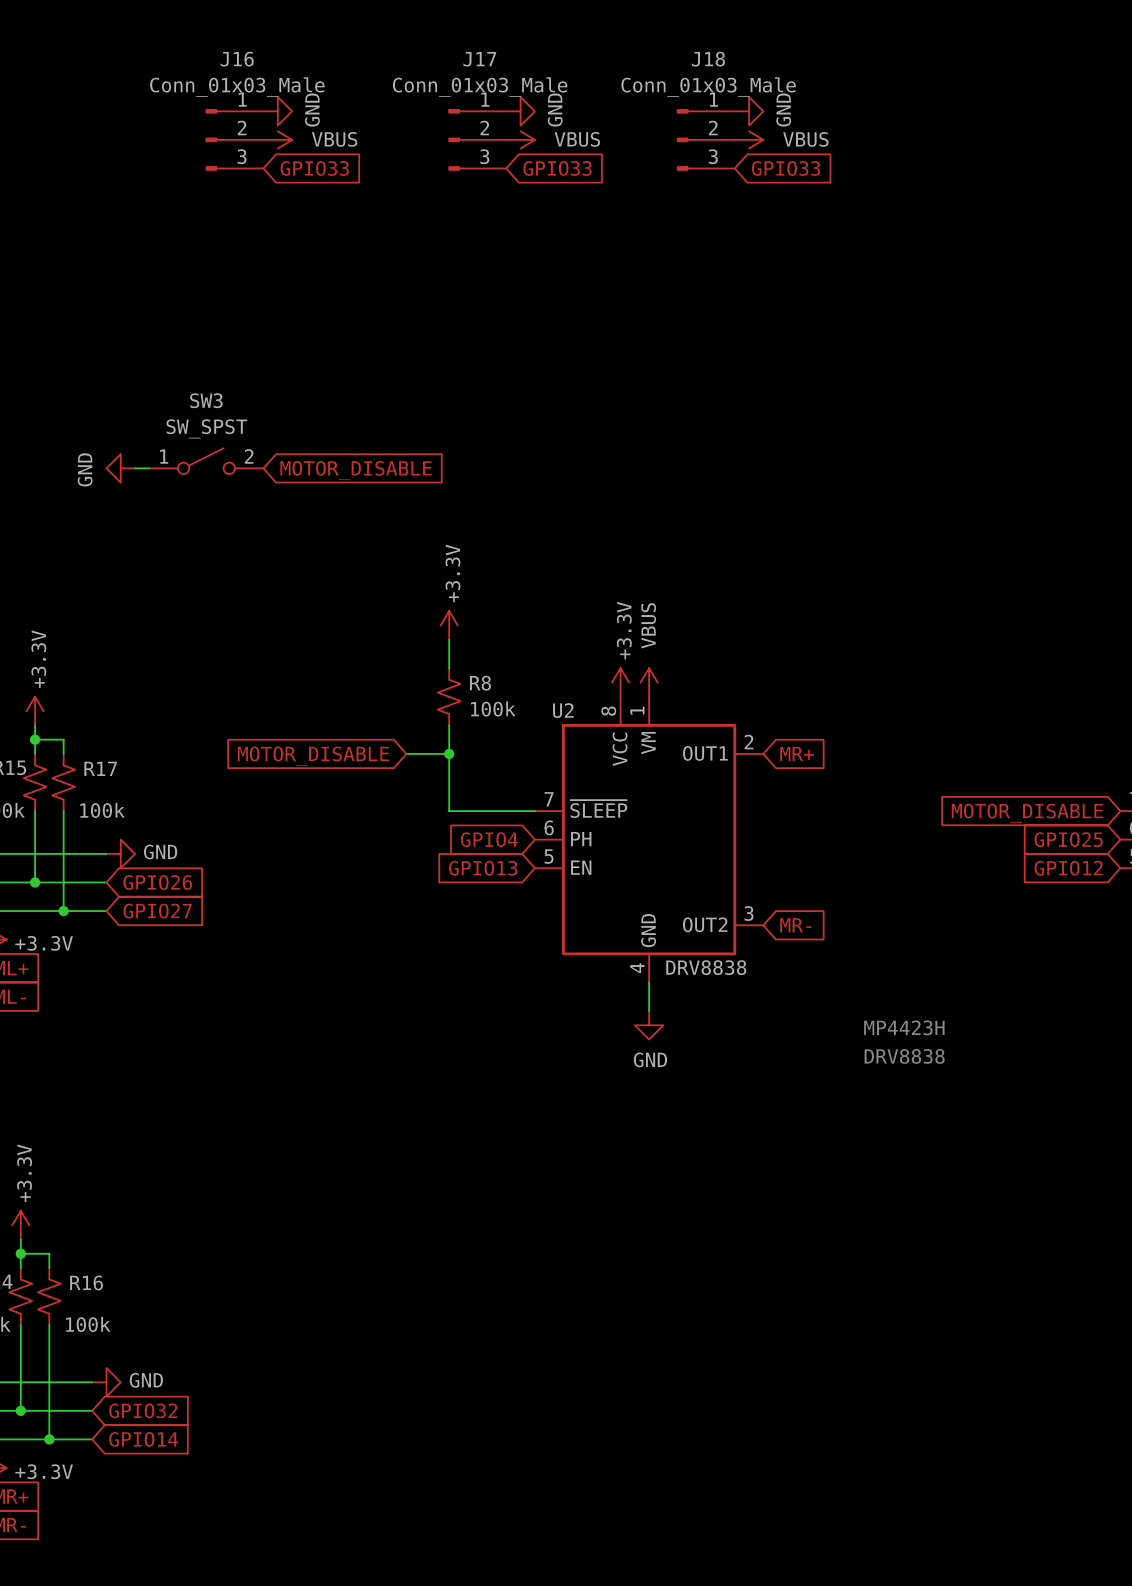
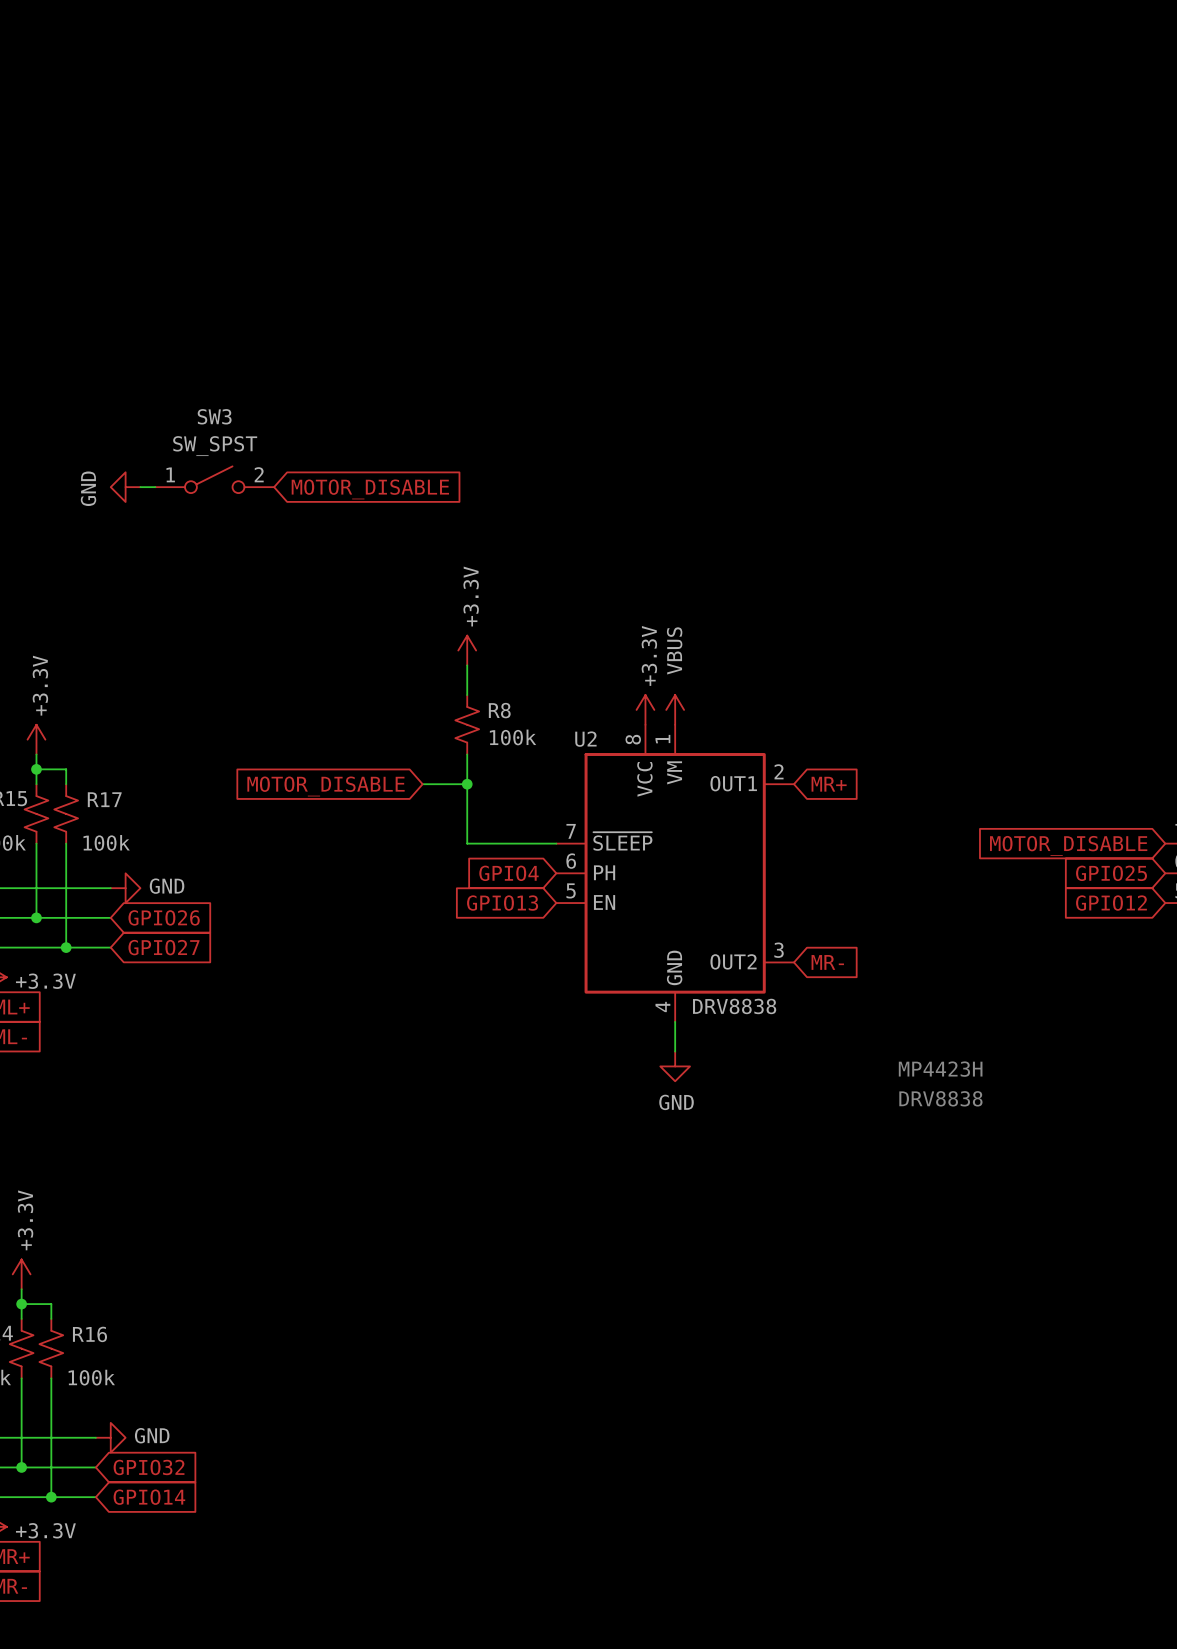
power symbol: GND (277, 111) -> none
power symbol: GND (520, 111) -> none
power symbol: GND (749, 111) -> none
J16: Conn_01x03_Male (234, 139) -> none
power symbol: VBUS (277, 139) -> none
J17: Conn_01x03_Male (477, 139) -> none
power symbol: VBUS (520, 139) -> none
J18: Conn_01x03_Male (705, 139) -> none
power symbol: VBUS (749, 139) -> none
global label: GPIO33 (314, 168) -> none
global label: GPIO33 (557, 168) -> none
global label: GPIO33 (786, 168) -> none

